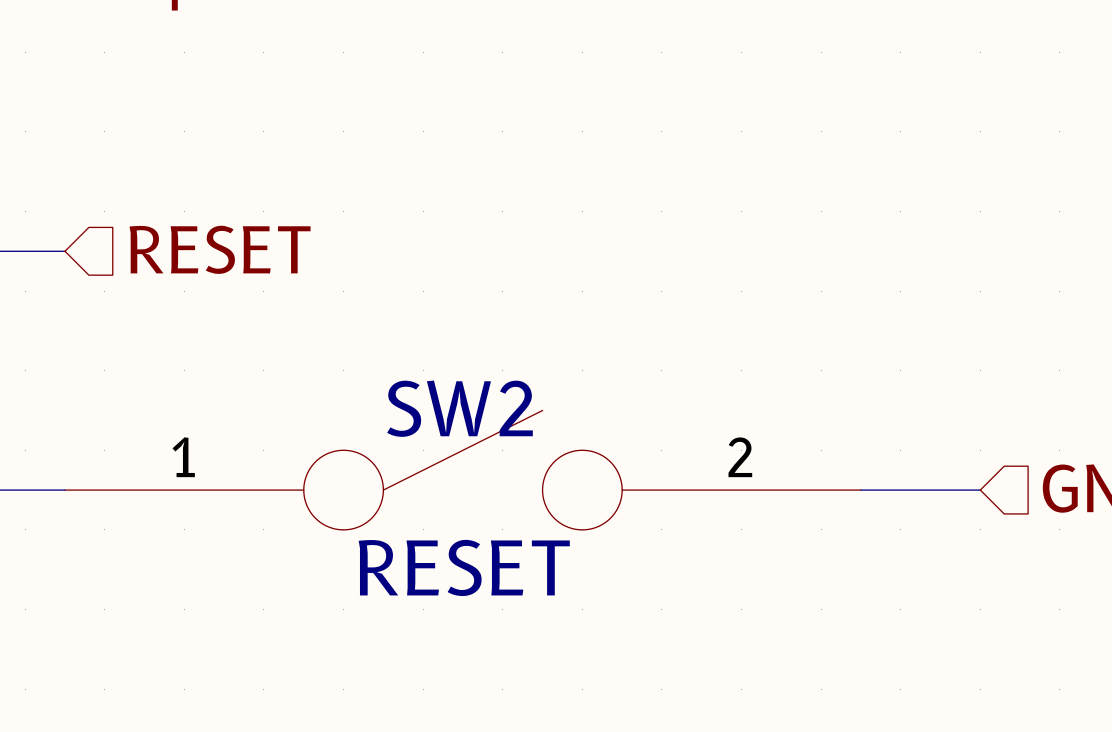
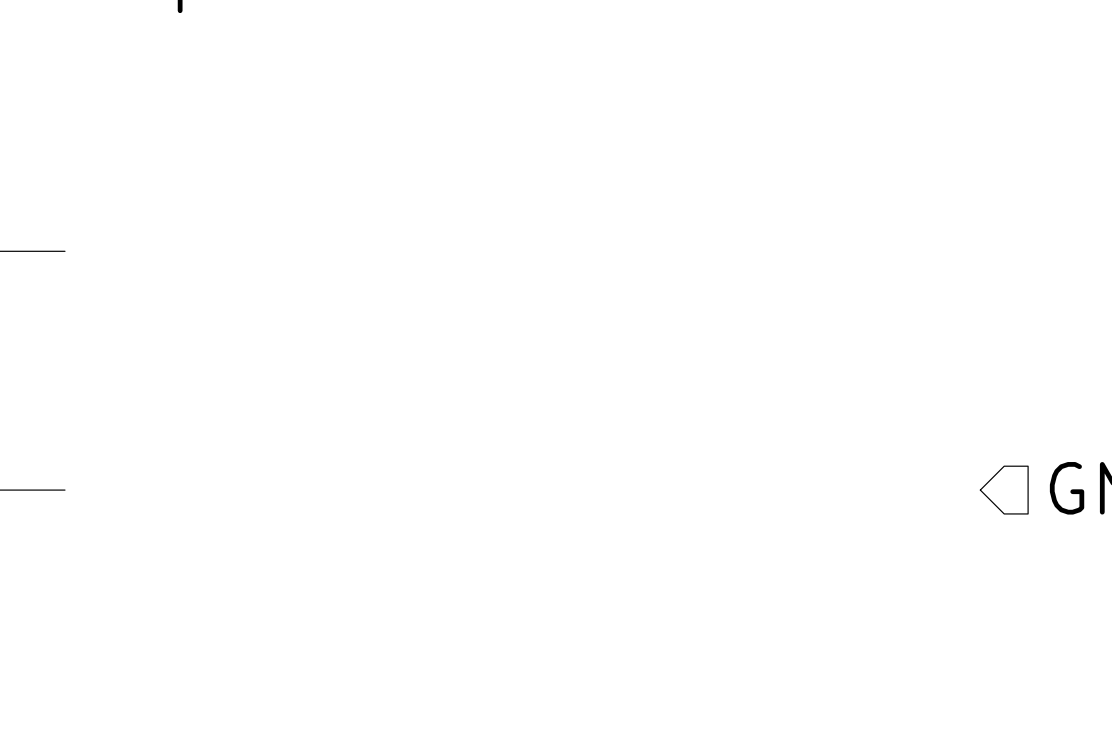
hierarchical label: RESET (220, 249) -> none
SW2: RESET (462, 470) -> none
wire: (860, 490) (980, 490) -> none

